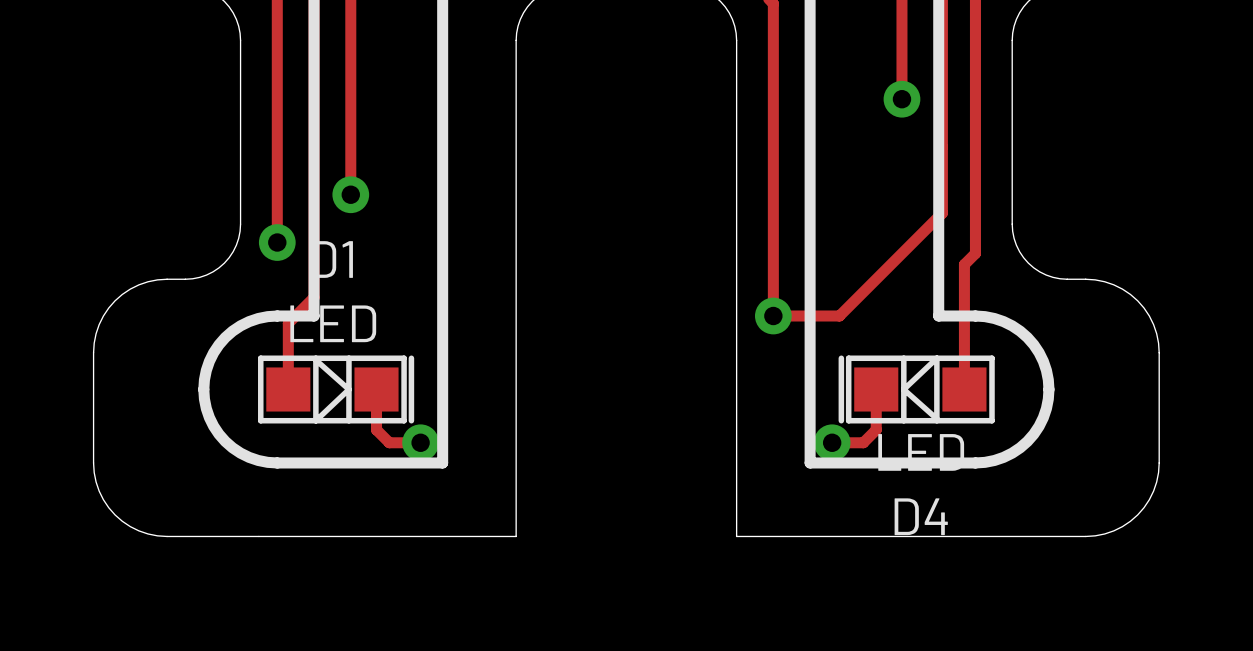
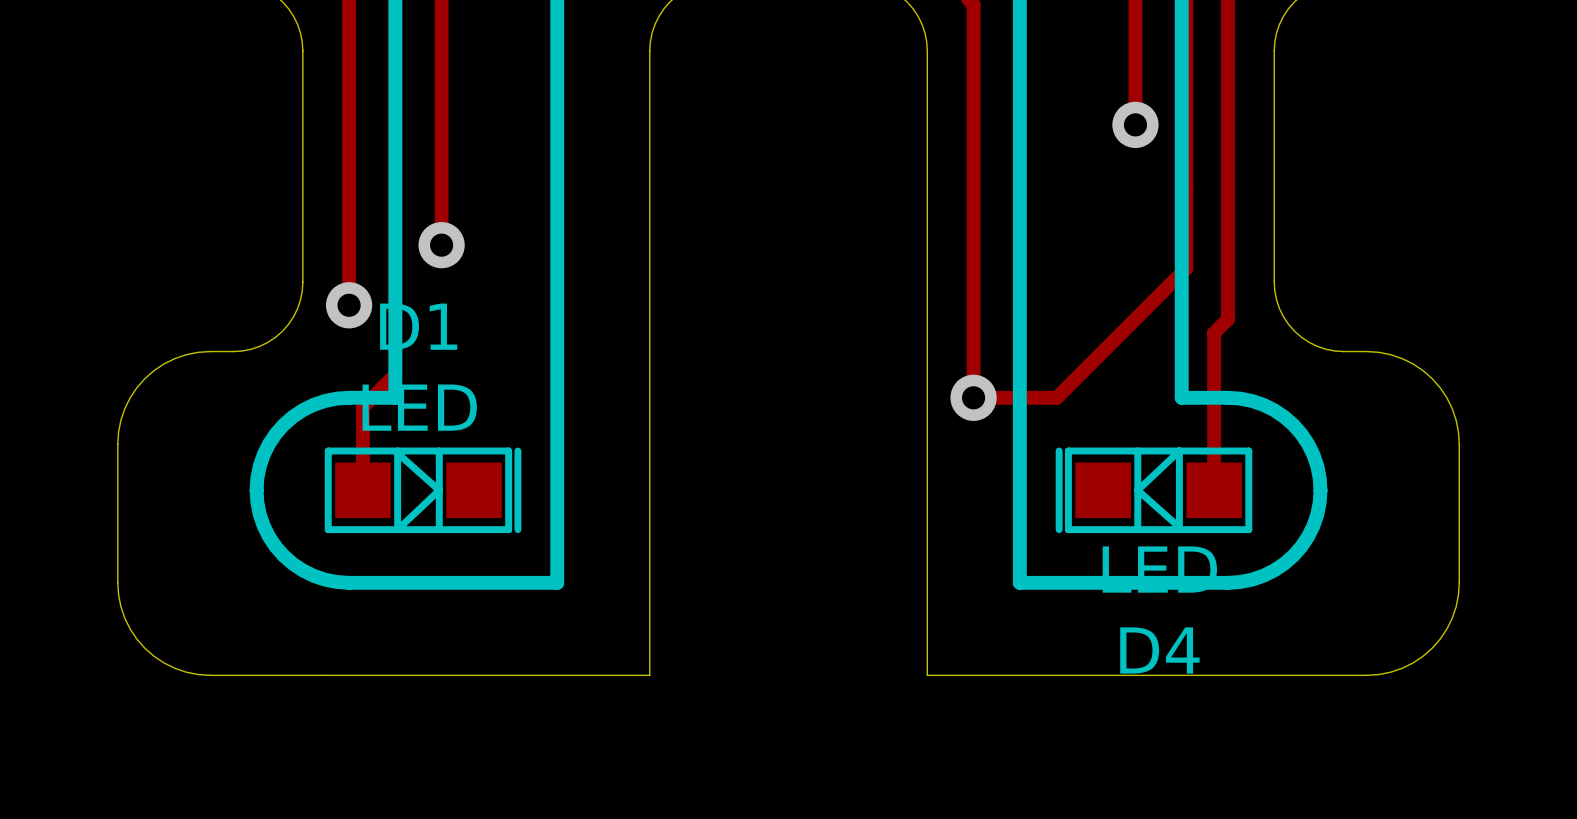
track: (376, 389) (376, 429) (389, 442) (420, 442) -> none
track: (876, 389) (876, 429) (863, 442) (832, 442) -> none
via: (420, 442) -> none
via: (832, 442) -> none

